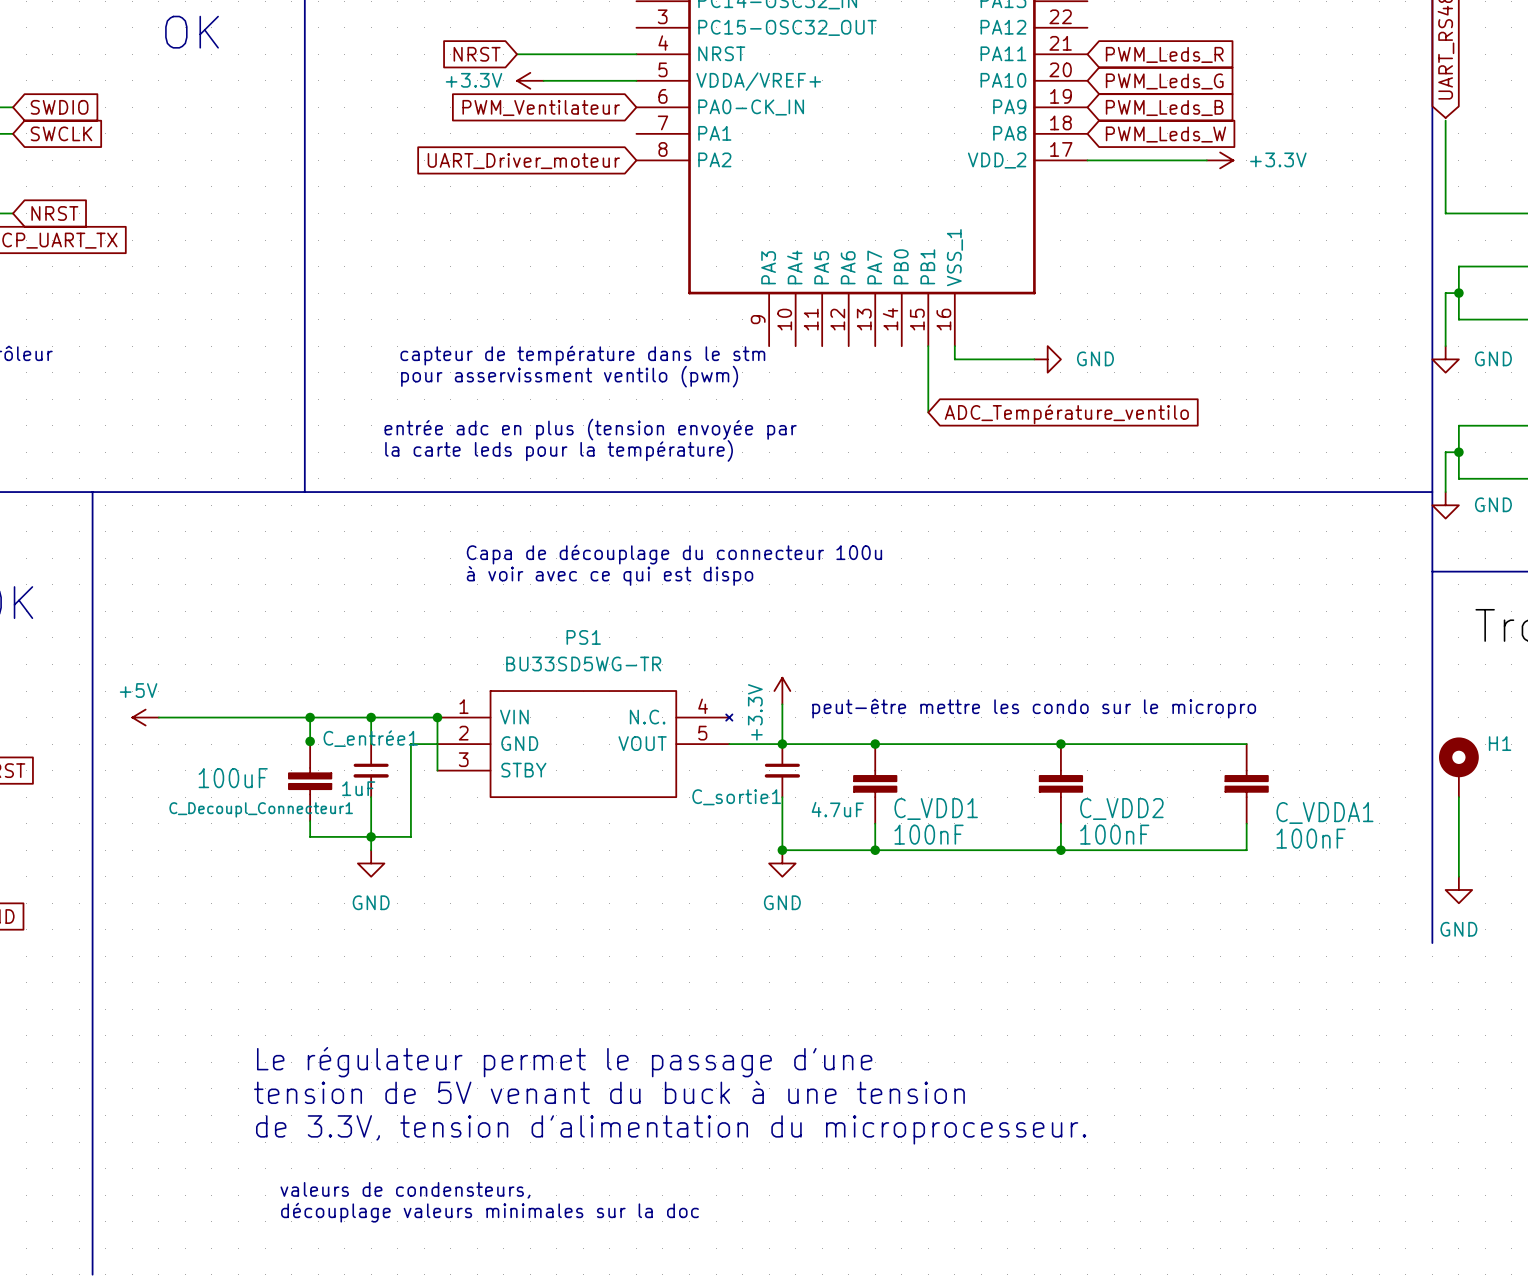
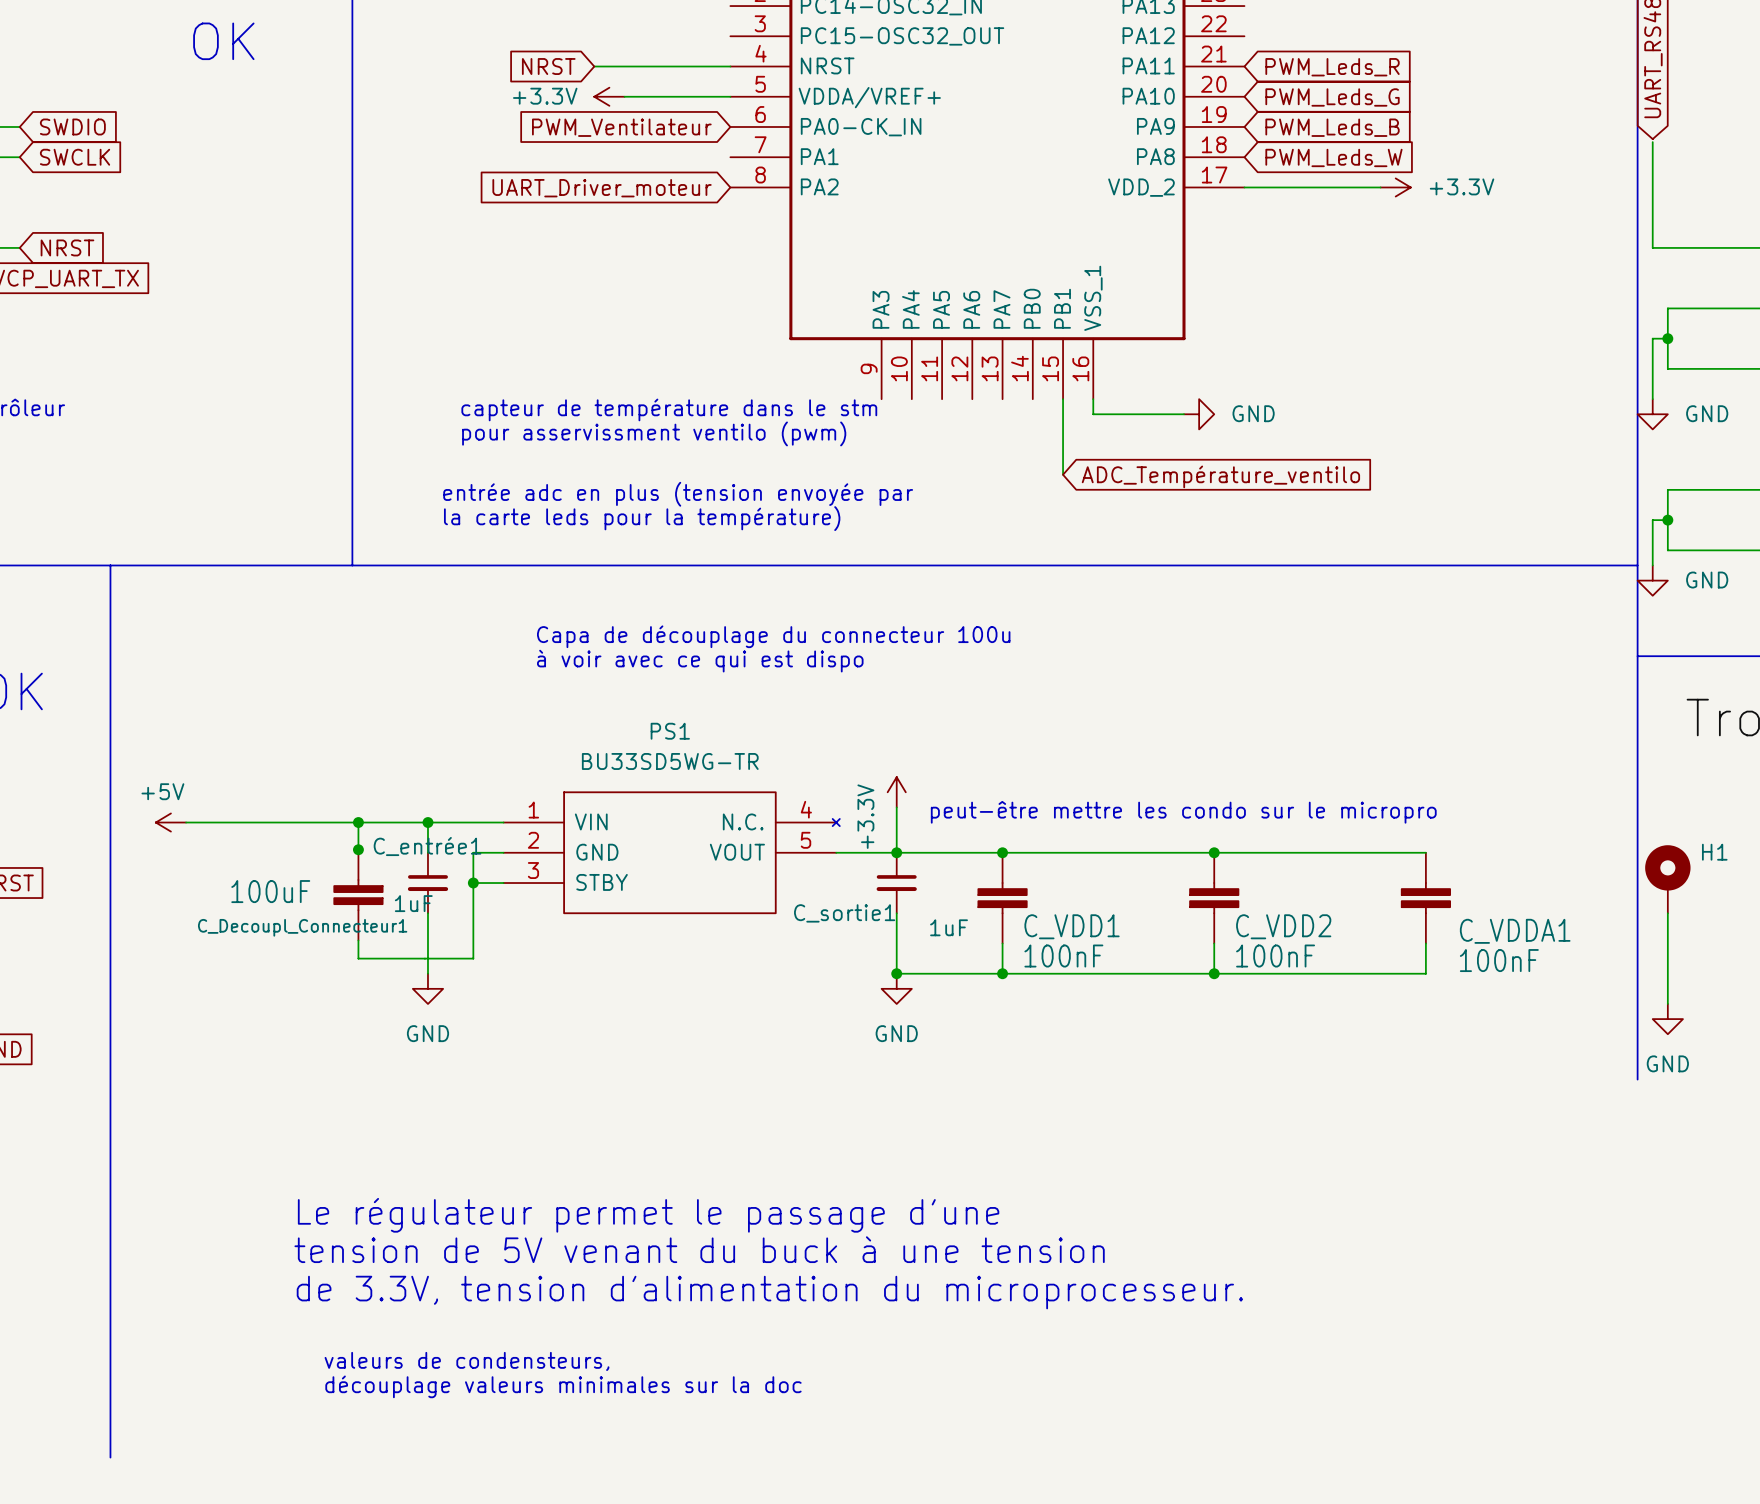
wire: (437, 714) (437, 770) -> (473, 883) (503, 883)
junction: (437, 717) -> none
junction: none -> (473, 883)
C_sortie1 value: 4.7uF (837, 809) -> 1uF (949, 927)
junction: (371, 836) -> none

